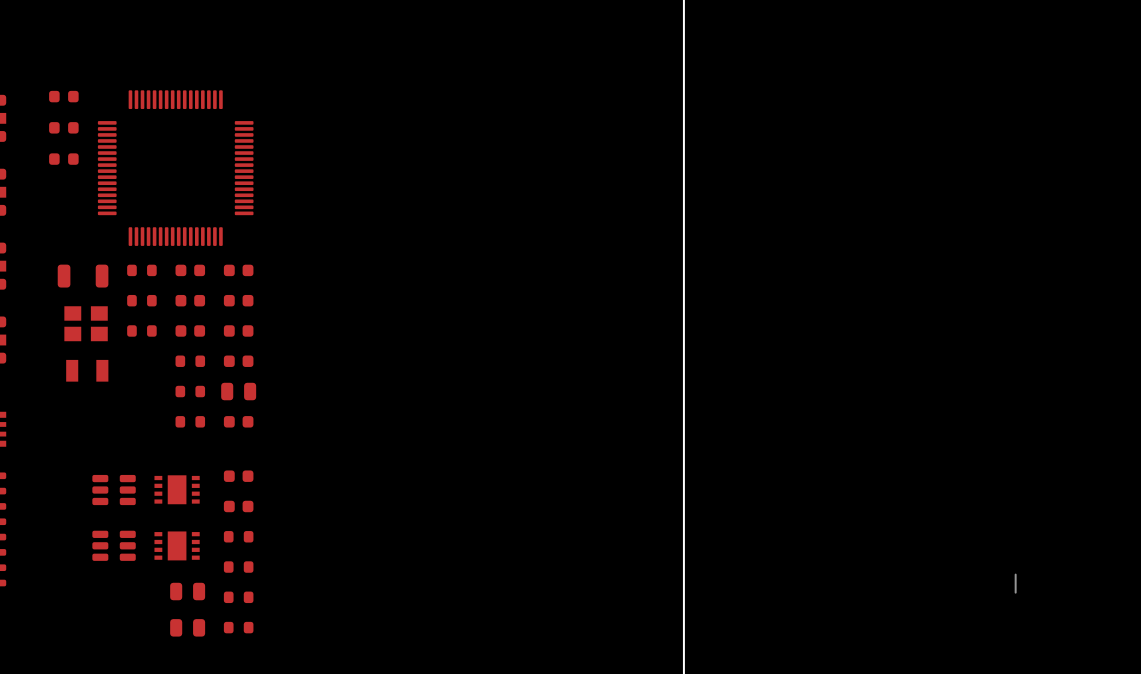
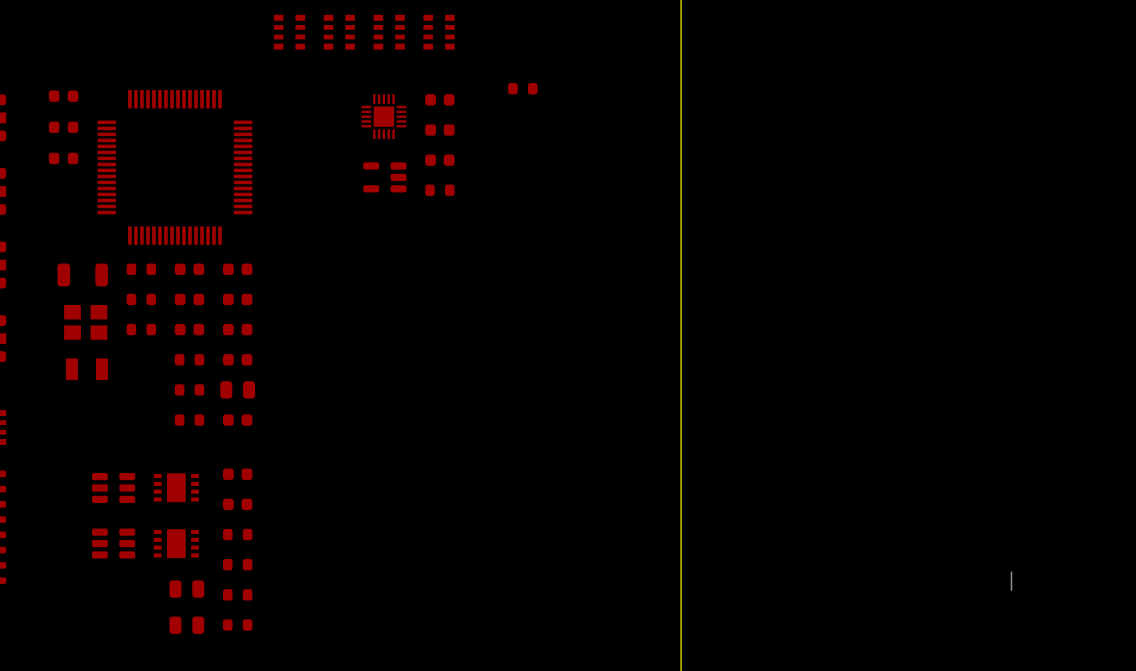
part: none -> (289, 32)
part: none -> (339, 32)
part: none -> (389, 32)
part: none -> (439, 32)
part: none -> (522, 88)
part: none -> (439, 99)
part: none -> (383, 116)
part: none -> (439, 130)
part: none -> (439, 160)
part: none -> (384, 177)
part: none -> (439, 190)

